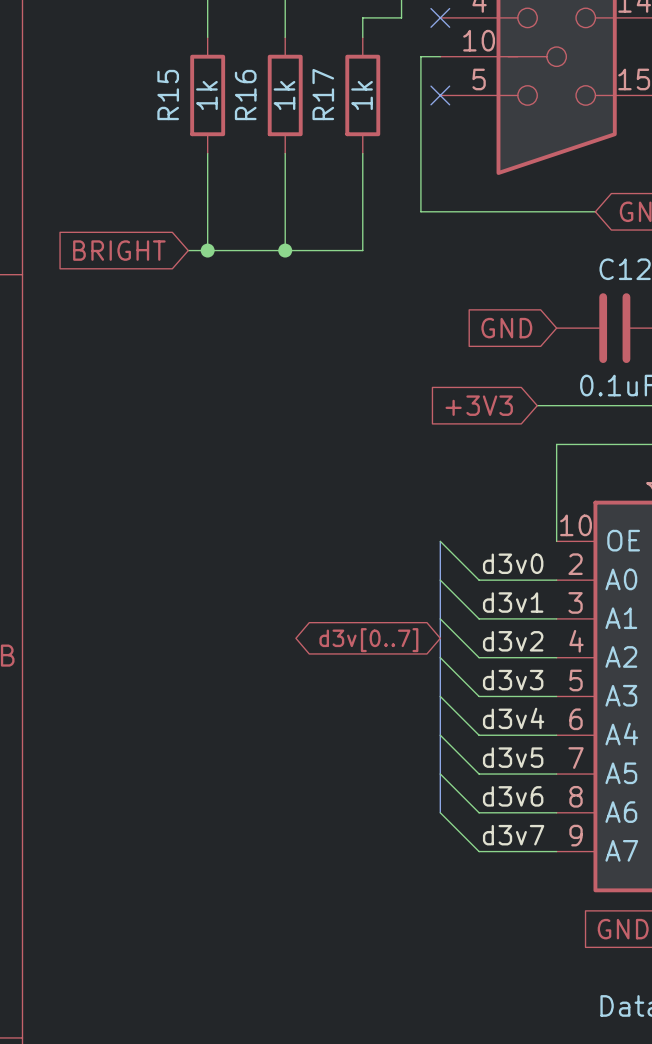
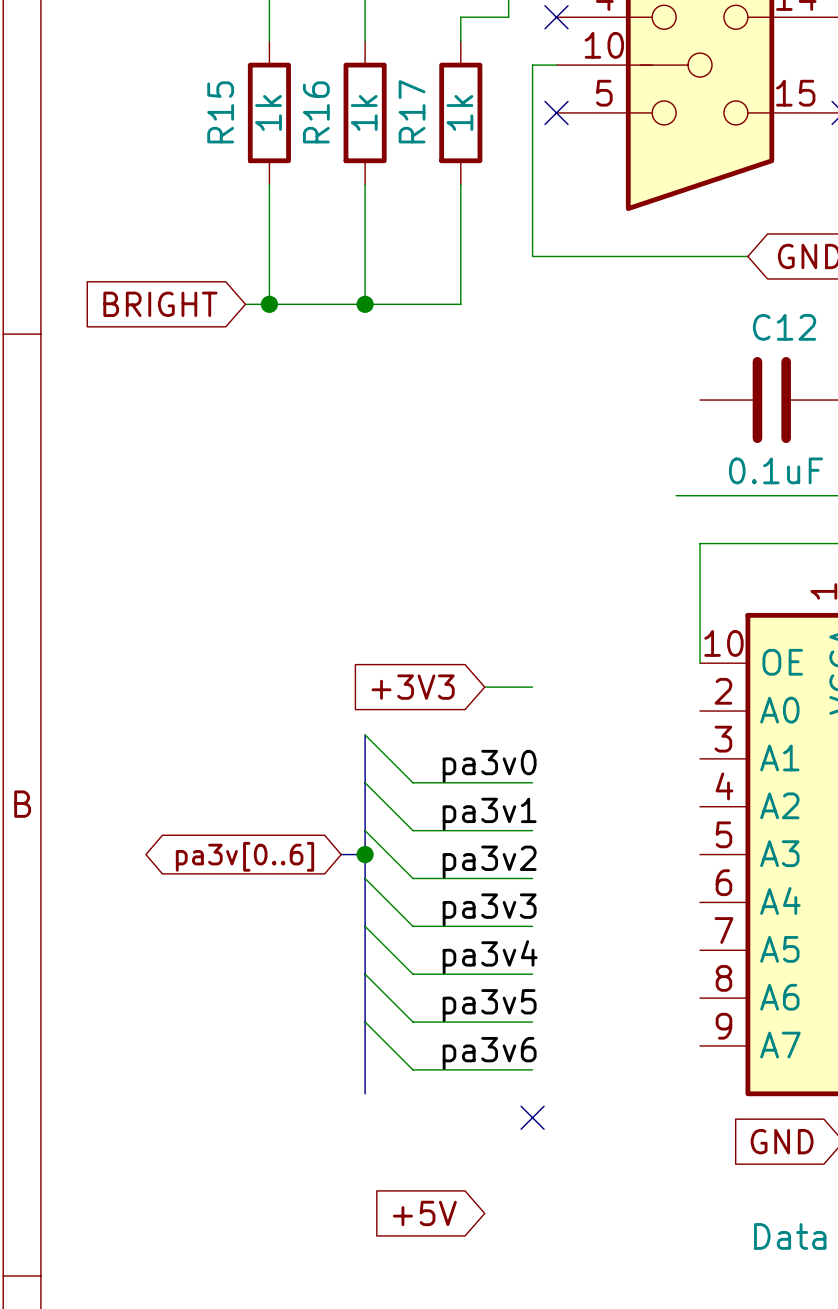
global label: GND (506, 328) -> none
global label position: +3V3 (479, 405) -> +3V3 (413, 687)
wire: (440, 541) (479, 580) (556, 580) -> none
bus: (440, 541) (440, 812) -> none
wire: none -> (484, 687) (532, 687)
label: d3v0 (513, 563) -> none
wire: (440, 580) (479, 618) (556, 618) -> none
wire: none -> (365, 734) (412, 782) (532, 782)
bus: none -> (365, 734) (365, 1093)
label: d3v1 (513, 602) -> none
wire: (440, 618) (479, 657) (556, 657) -> none
label: none -> pa3v0 (489, 766)
wire: none -> (365, 782) (412, 830) (532, 830)
global label: d3v[0..7] (368, 640) -> none
label: d3v2 (513, 641) -> none
wire: (440, 657) (479, 696) (556, 696) -> none
label: none -> pa3v1 (489, 814)
wire: none -> (365, 830) (412, 878) (532, 878)
label: d3v3 (513, 680) -> none
bus: none -> (341, 854) (365, 854)
junction: none -> (365, 854)
wire: (440, 696) (479, 735) (556, 735) -> none
global label: none -> pa3v[0..6] (244, 856)
label: none -> pa3v2 (489, 862)
wire: none -> (365, 878) (412, 926) (532, 926)
label: d3v4 (513, 718) -> none
wire: (440, 735) (479, 774) (556, 774) -> none
label: none -> pa3v3 (489, 909)
wire: none -> (365, 926) (412, 974) (532, 974)
label: d3v5 (513, 757) -> none
wire: (440, 774) (479, 812) (556, 812) -> none
label: none -> pa3v4 (490, 957)
wire: none -> (365, 974) (412, 1022) (532, 1022)
label: d3v6 (513, 796) -> none
wire: (440, 812) (479, 851) (556, 851) -> none
label: none -> pa3v5 (489, 1005)
wire: none -> (365, 1022) (412, 1069) (532, 1069)
label: d3v7 (513, 835) -> none
label: none -> pa3v6 (489, 1053)
no-connect mark: none -> (532, 1117)
global label: none -> +5V (424, 1213)

